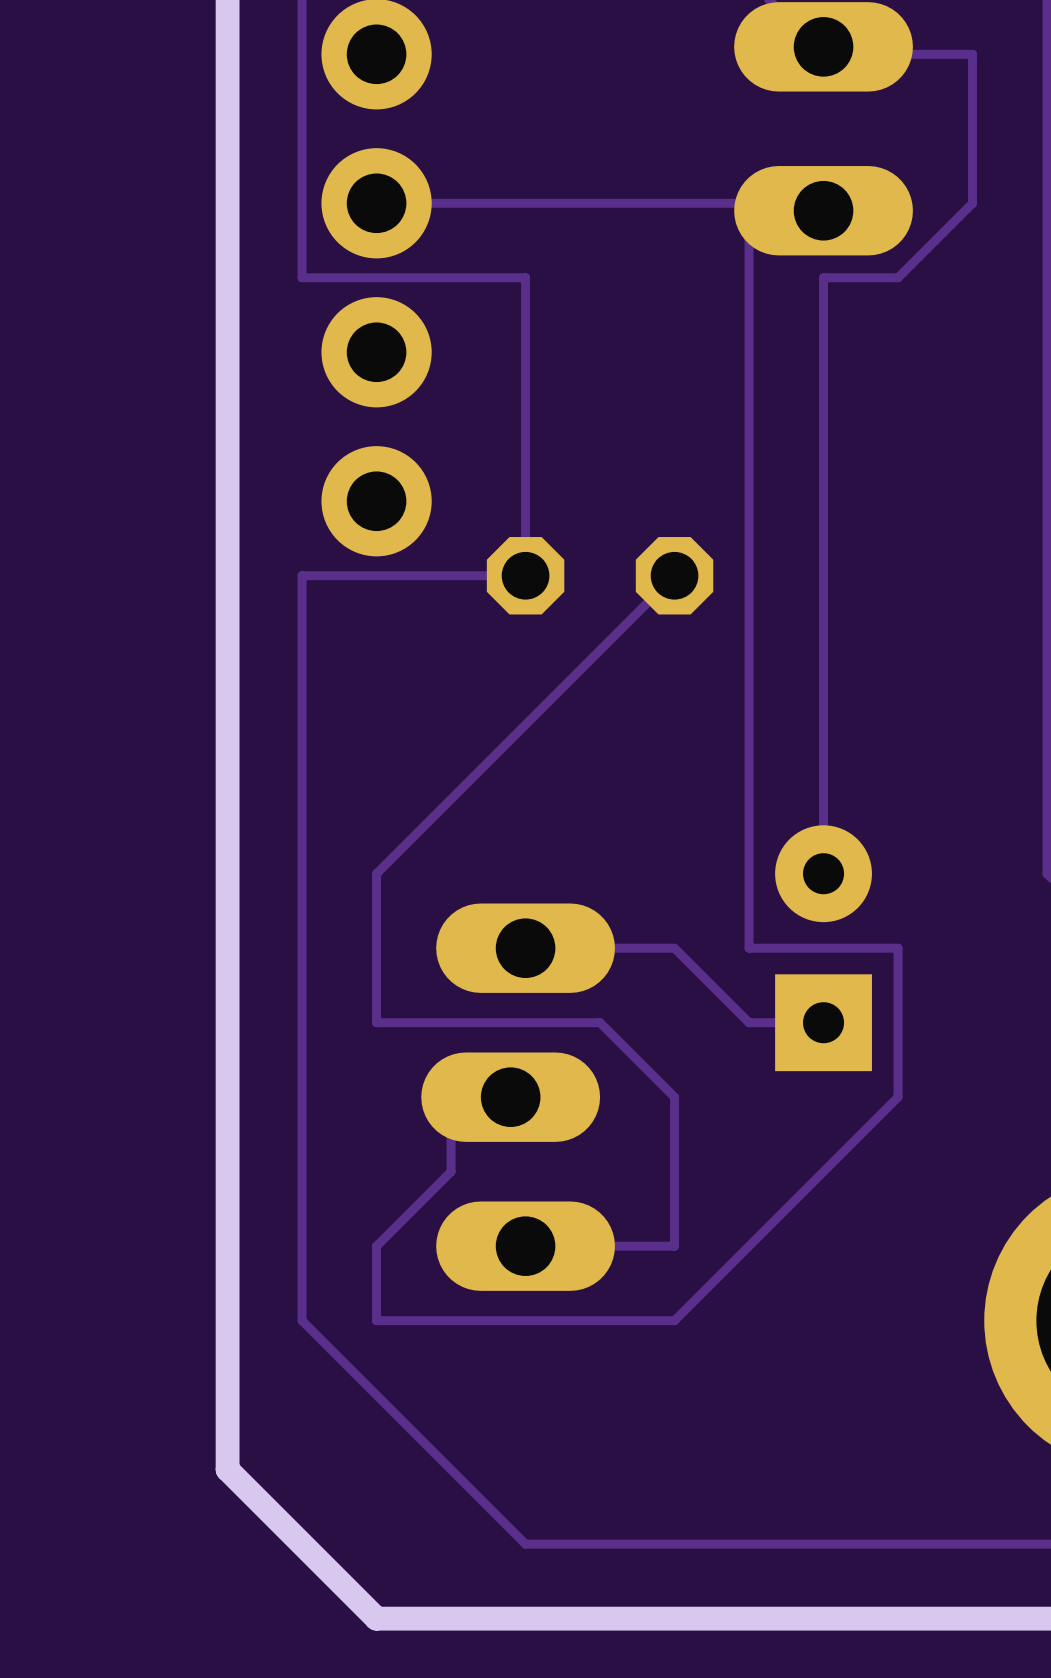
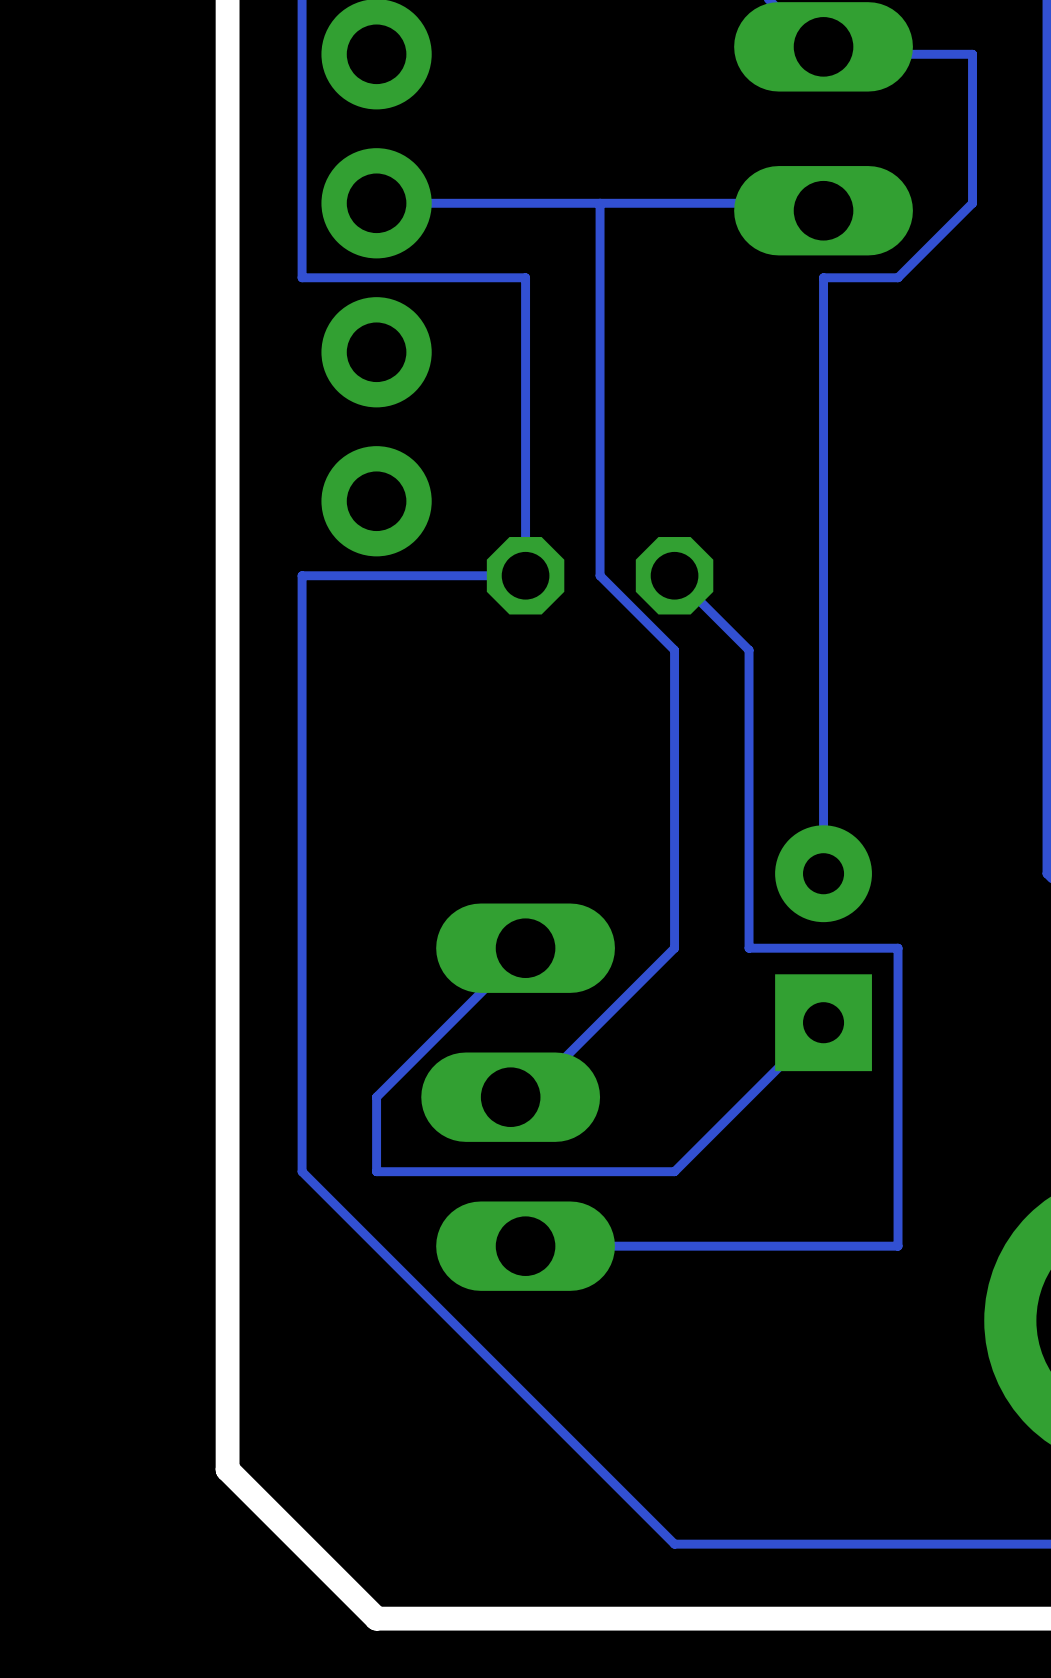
track: none -> (600, 203) (600, 575) (674, 650) (674, 948) (525, 1097) (510, 1097)
track: (823, 210) (749, 203) (749, 650) -> (674, 575) (749, 650)
track: (674, 575) (376, 873) (376, 1022) (600, 1022) (674, 1097) (674, 1246) -> none
track: (525, 948) (674, 948) (749, 1022) (823, 1022) -> (525, 948) (376, 1097) (376, 1171) (674, 1171) (823, 1022)
track: (898, 1097) (674, 1320) (376, 1320) (376, 1246) (451, 1171) (451, 1097) (510, 1097) -> (898, 1097) (898, 1246) (674, 1246)
track: (302, 1171) (302, 1320) (525, 1544) (674, 1544) -> (302, 1171) (674, 1544)

